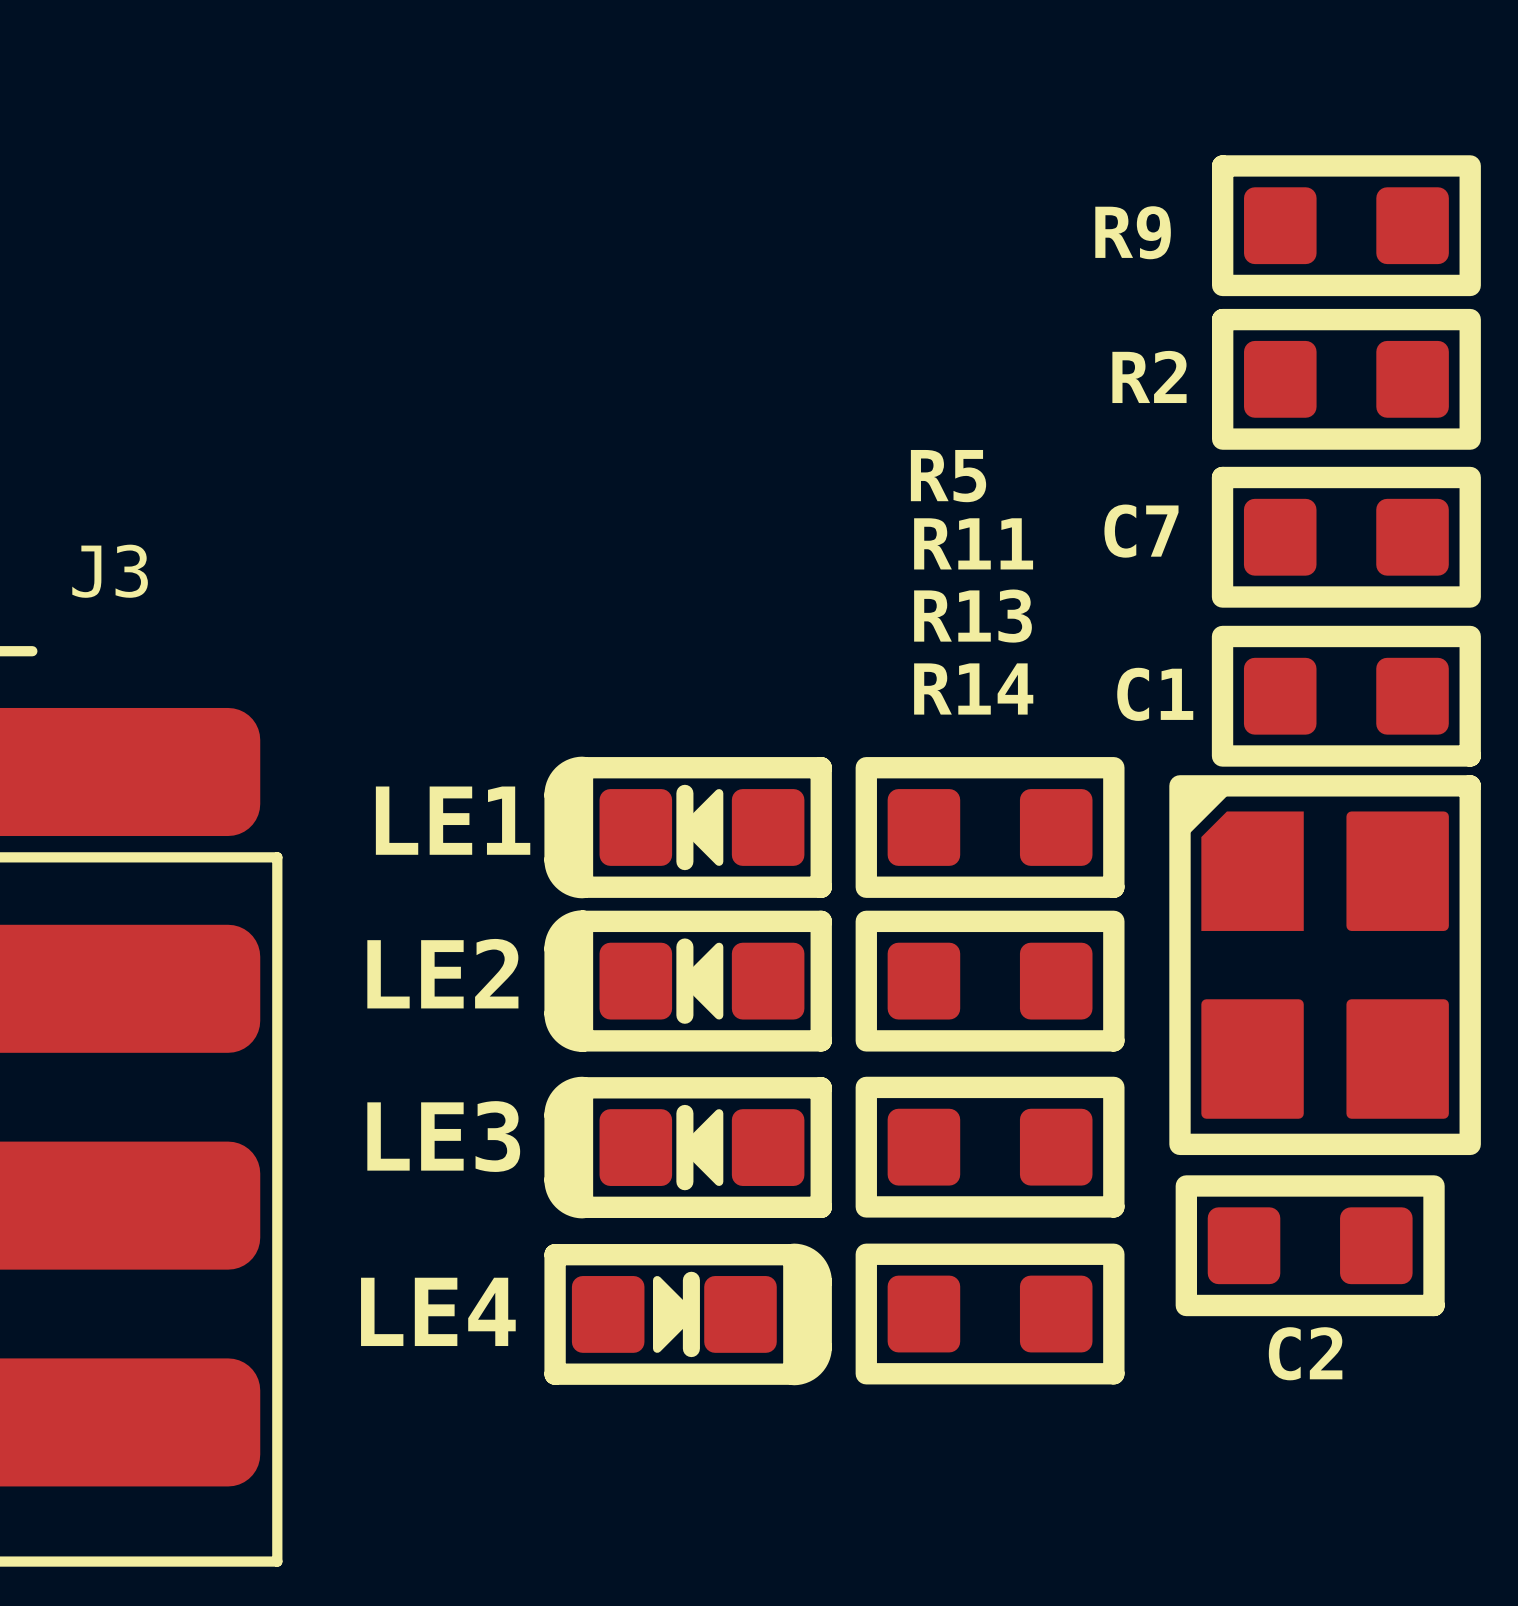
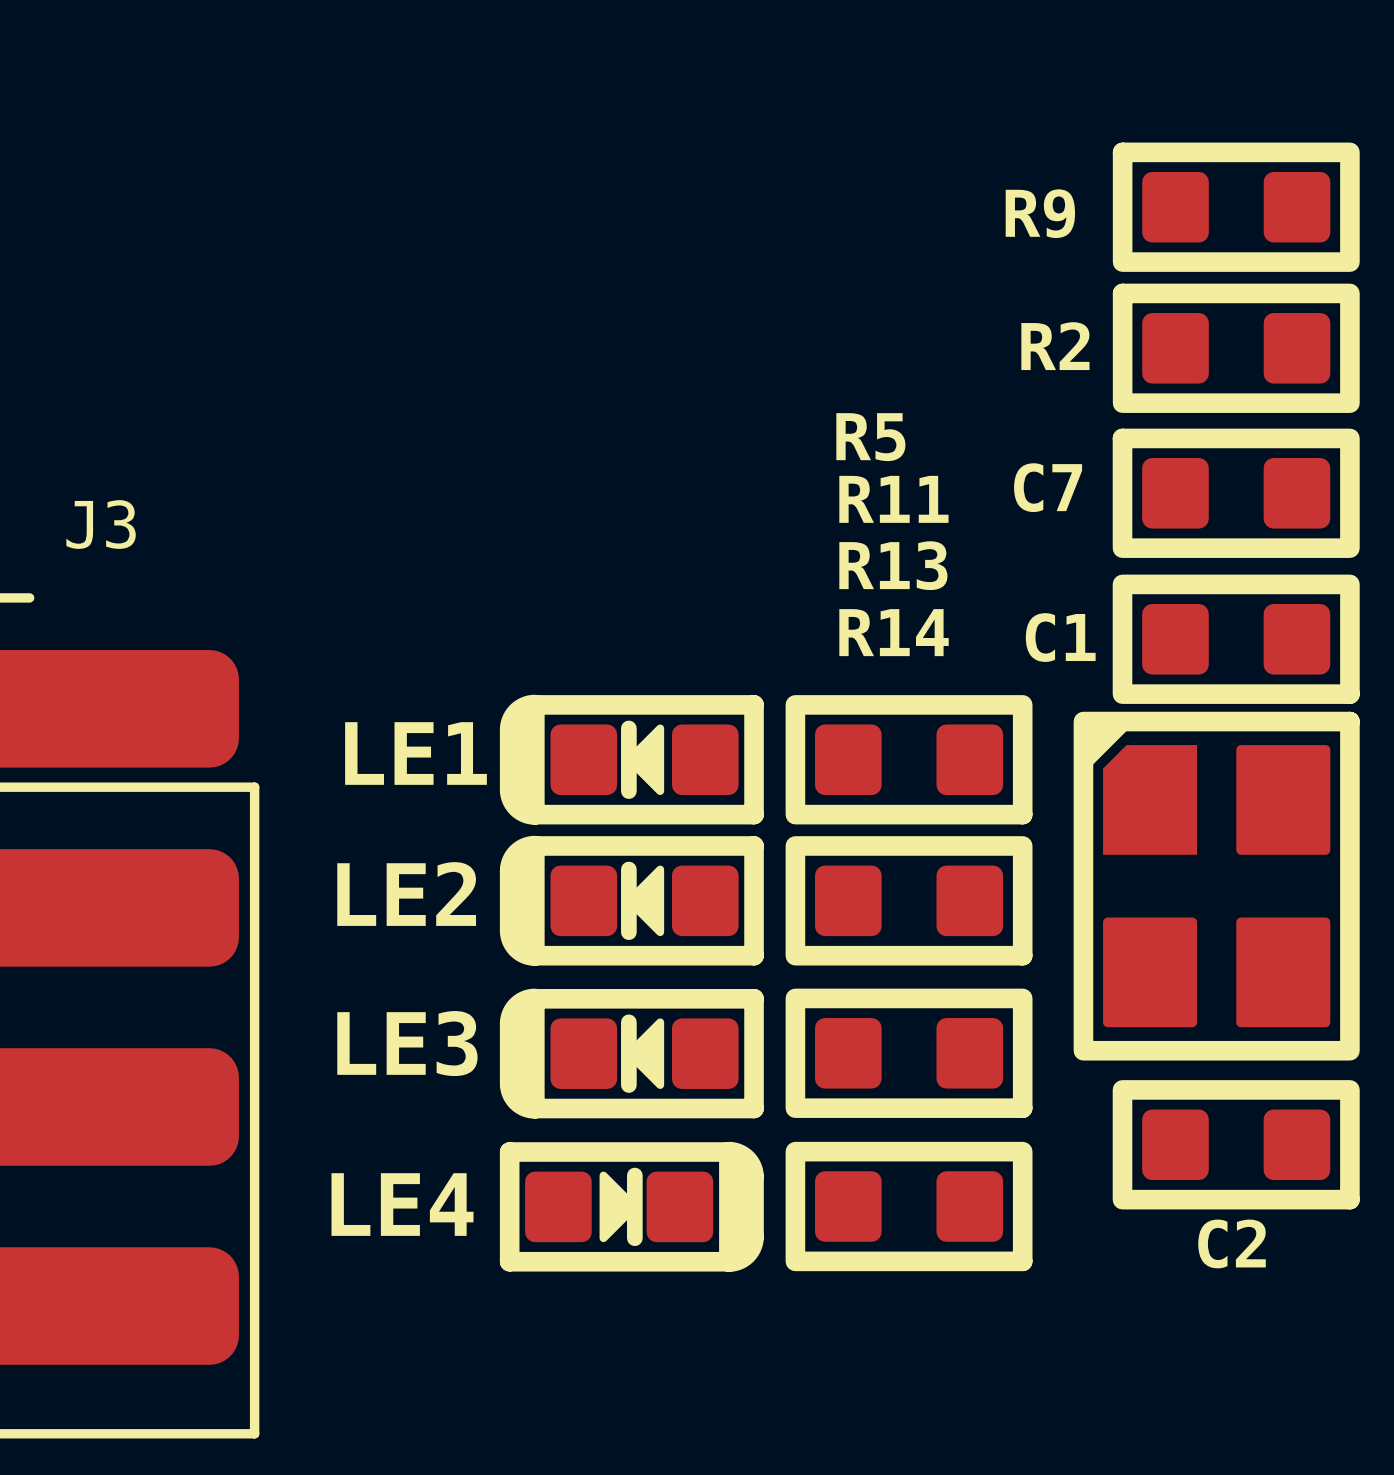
C2 position: (1310, 1245) -> (1236, 1144)

